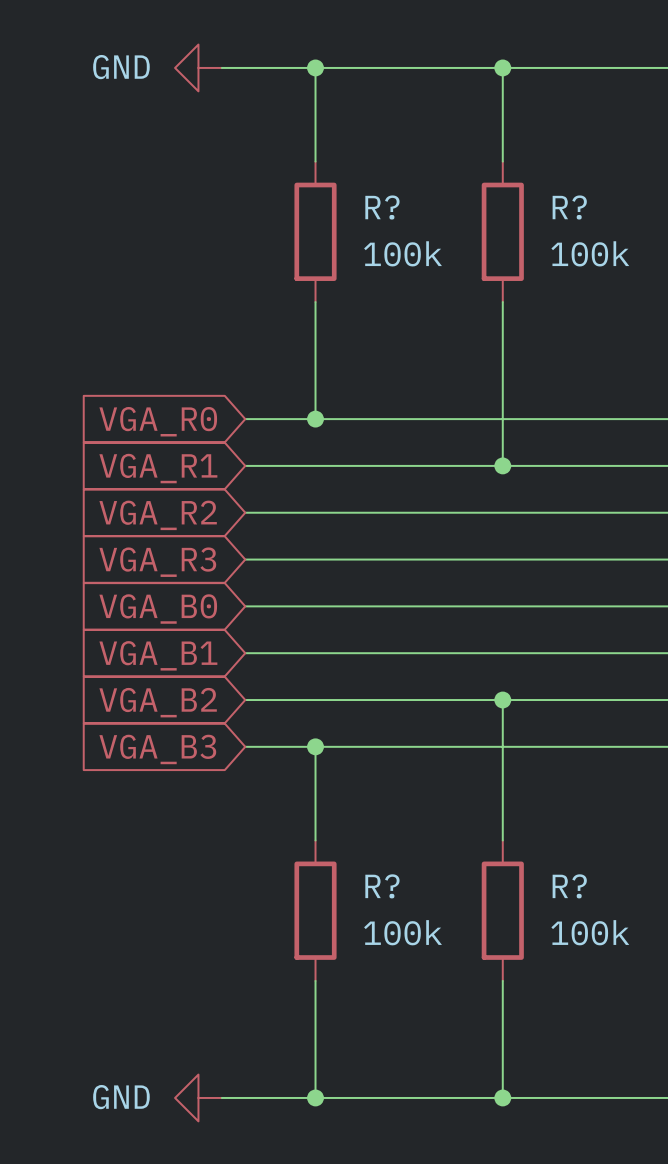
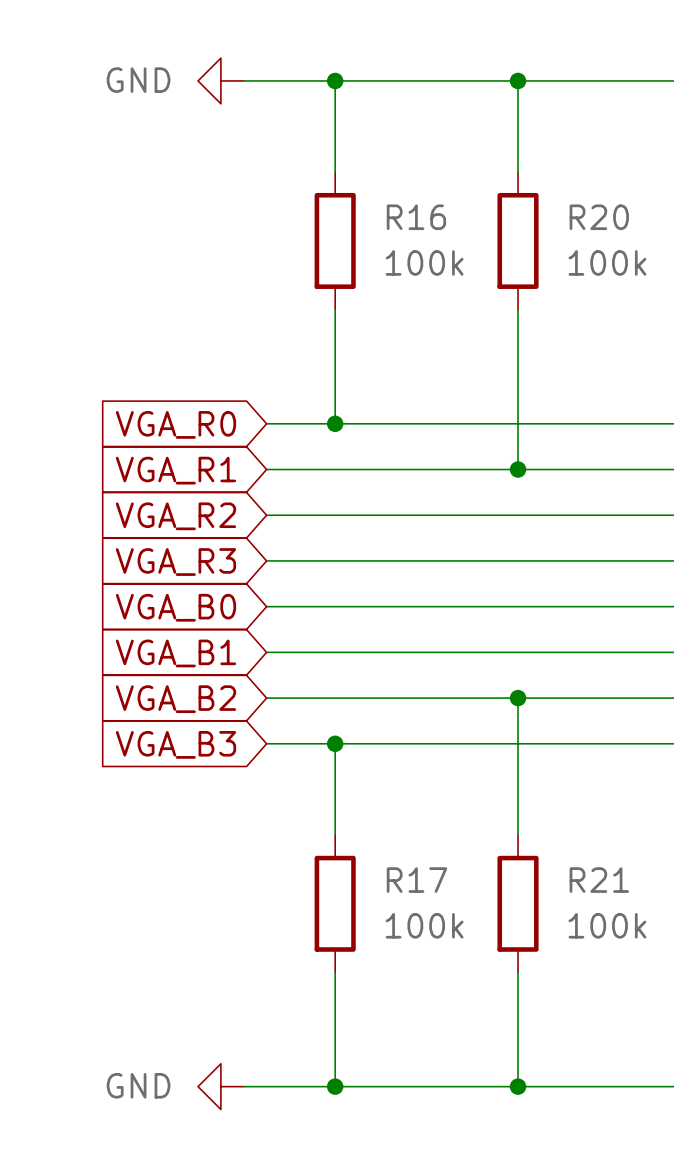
R? name: R? (382, 207) -> R16 (416, 217)
R? name: R? (569, 207) -> R20 (599, 217)
R? name: R? (382, 886) -> R17 (416, 880)
R? name: R? (569, 886) -> R21 (599, 880)

